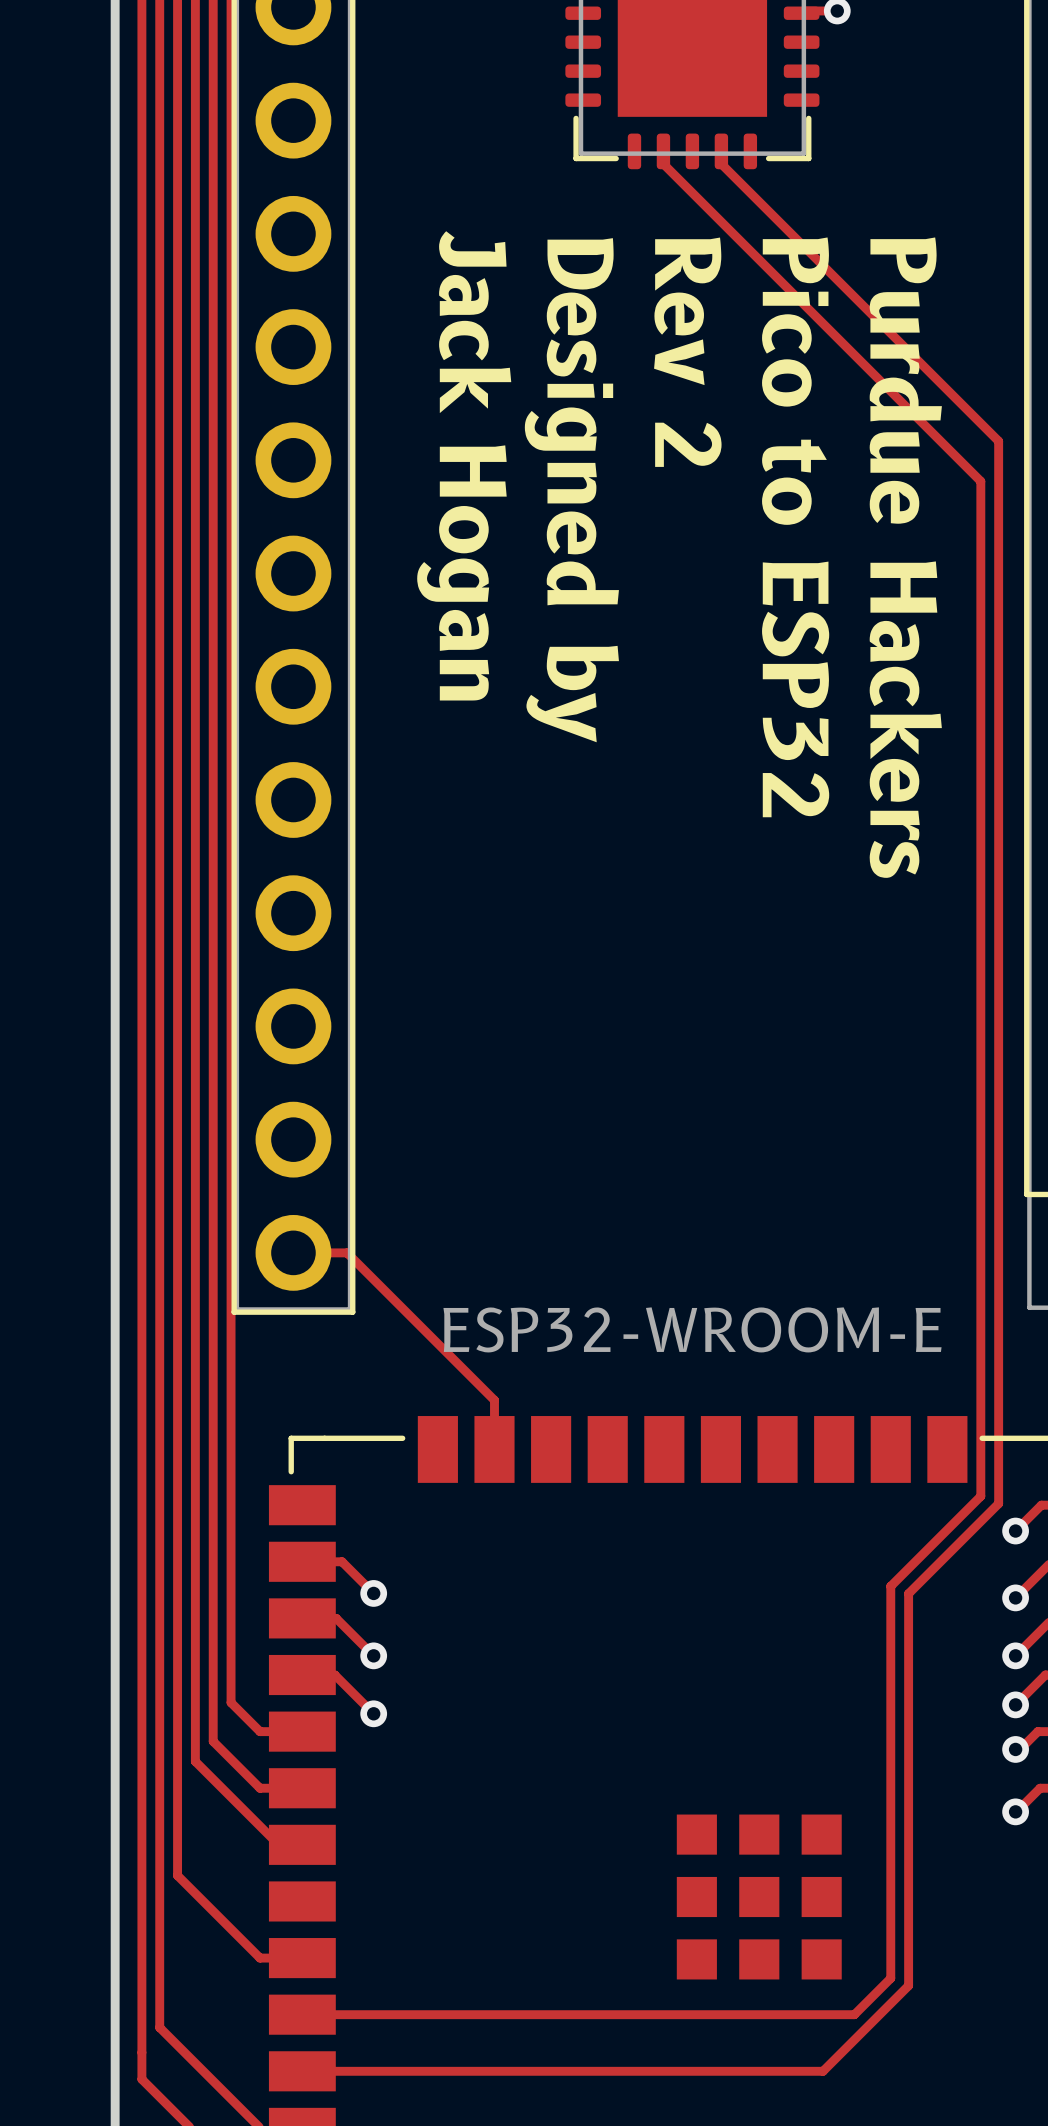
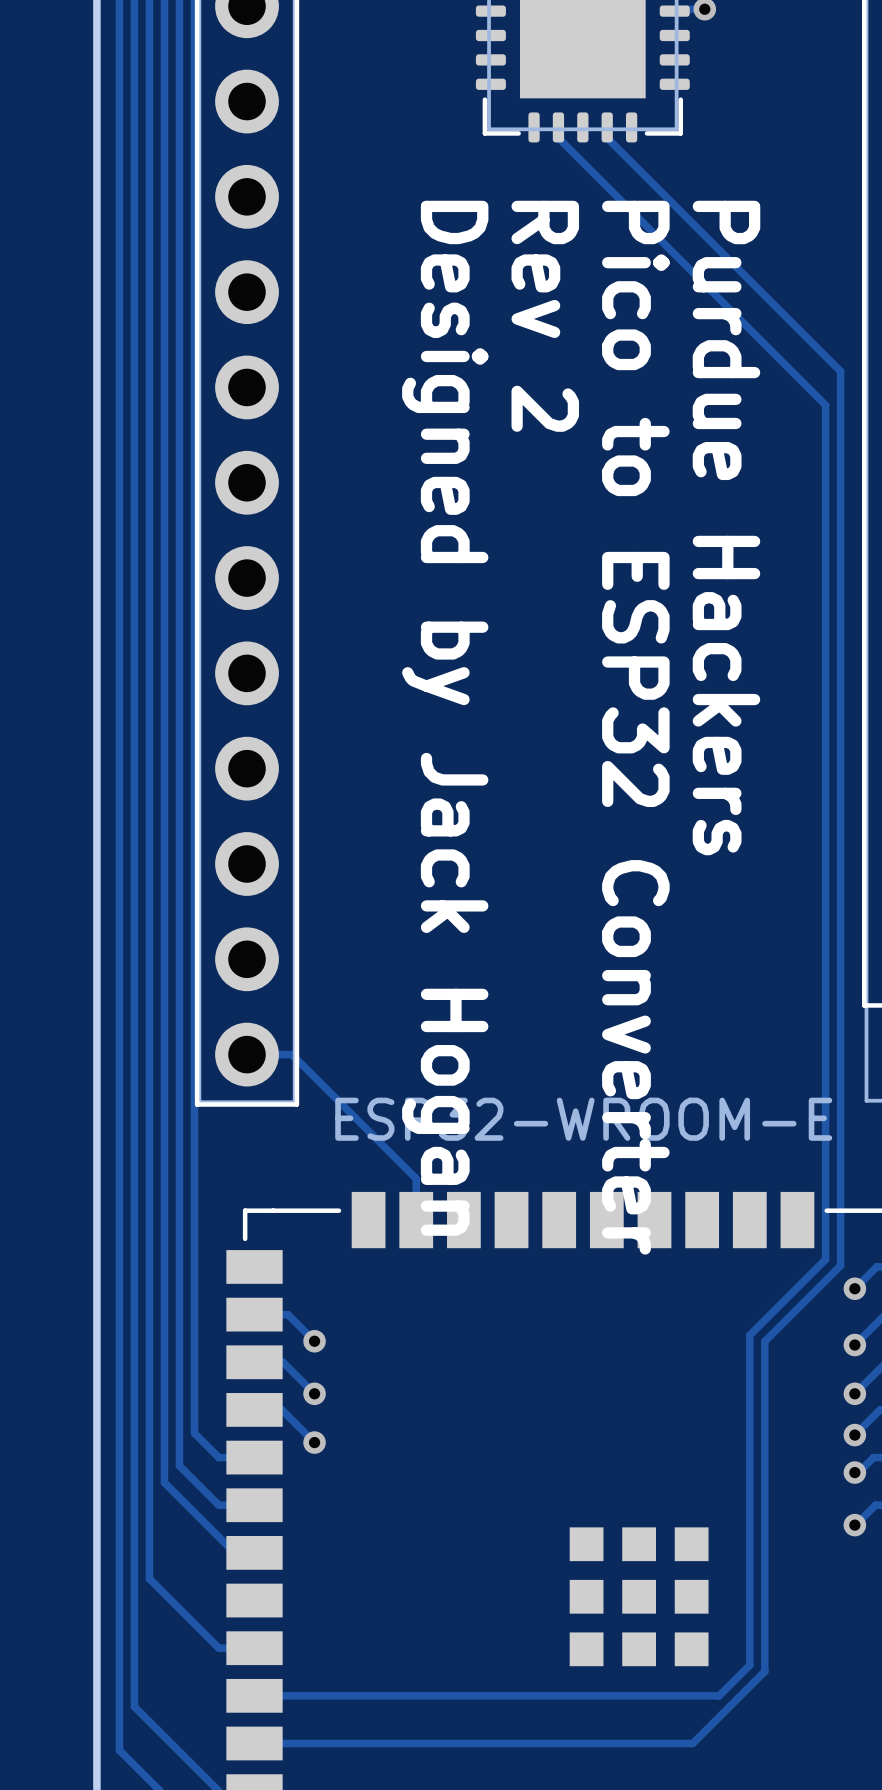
text position: Rev 2 (687, 352) -> Rev 2 (545, 316)
text: Jack Hogan (464, 465) -> none
text: Designed by (571, 490) -> none
text: Pico to ESP32 (795, 527) -> Pico to ESP32 Converter (635, 727)
text position: Purdue Hackers (905, 557) -> Purdue Hackers (726, 528)
text: none -> Designed by Jack Hogan (445, 718)

